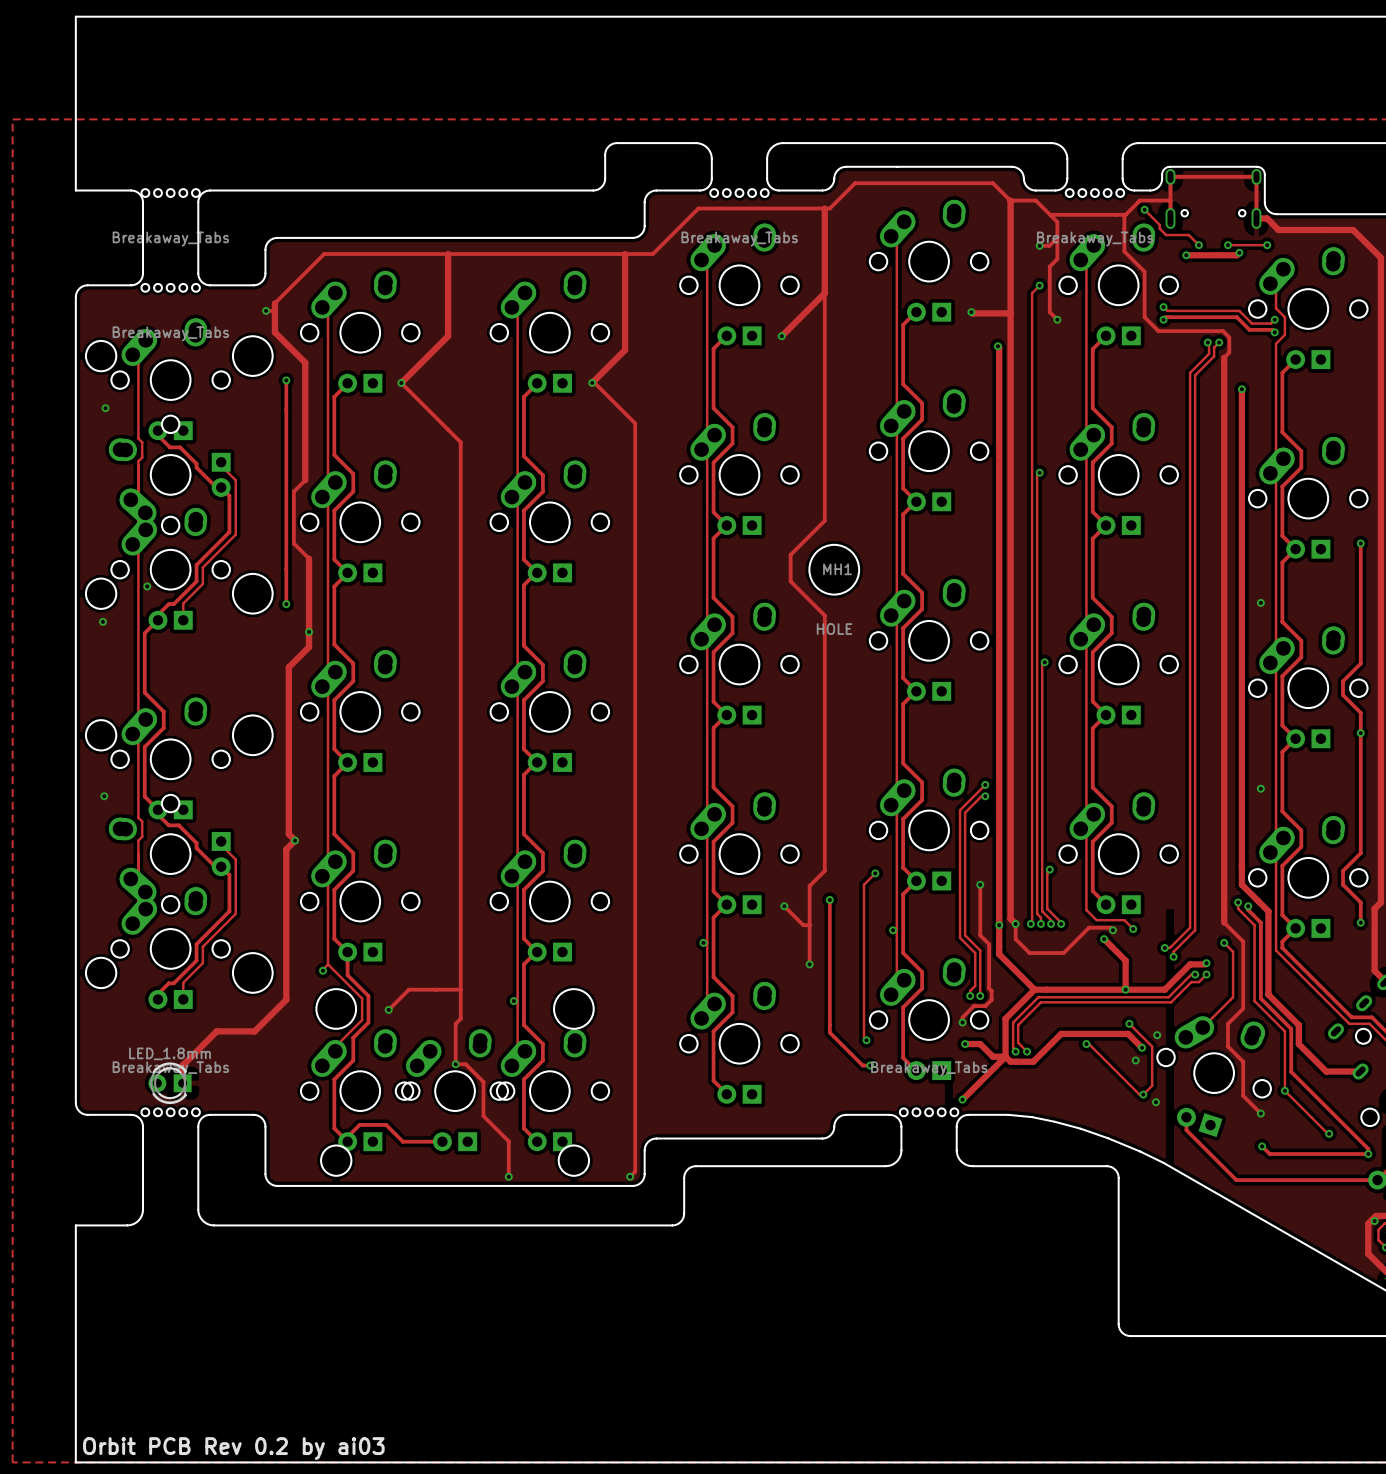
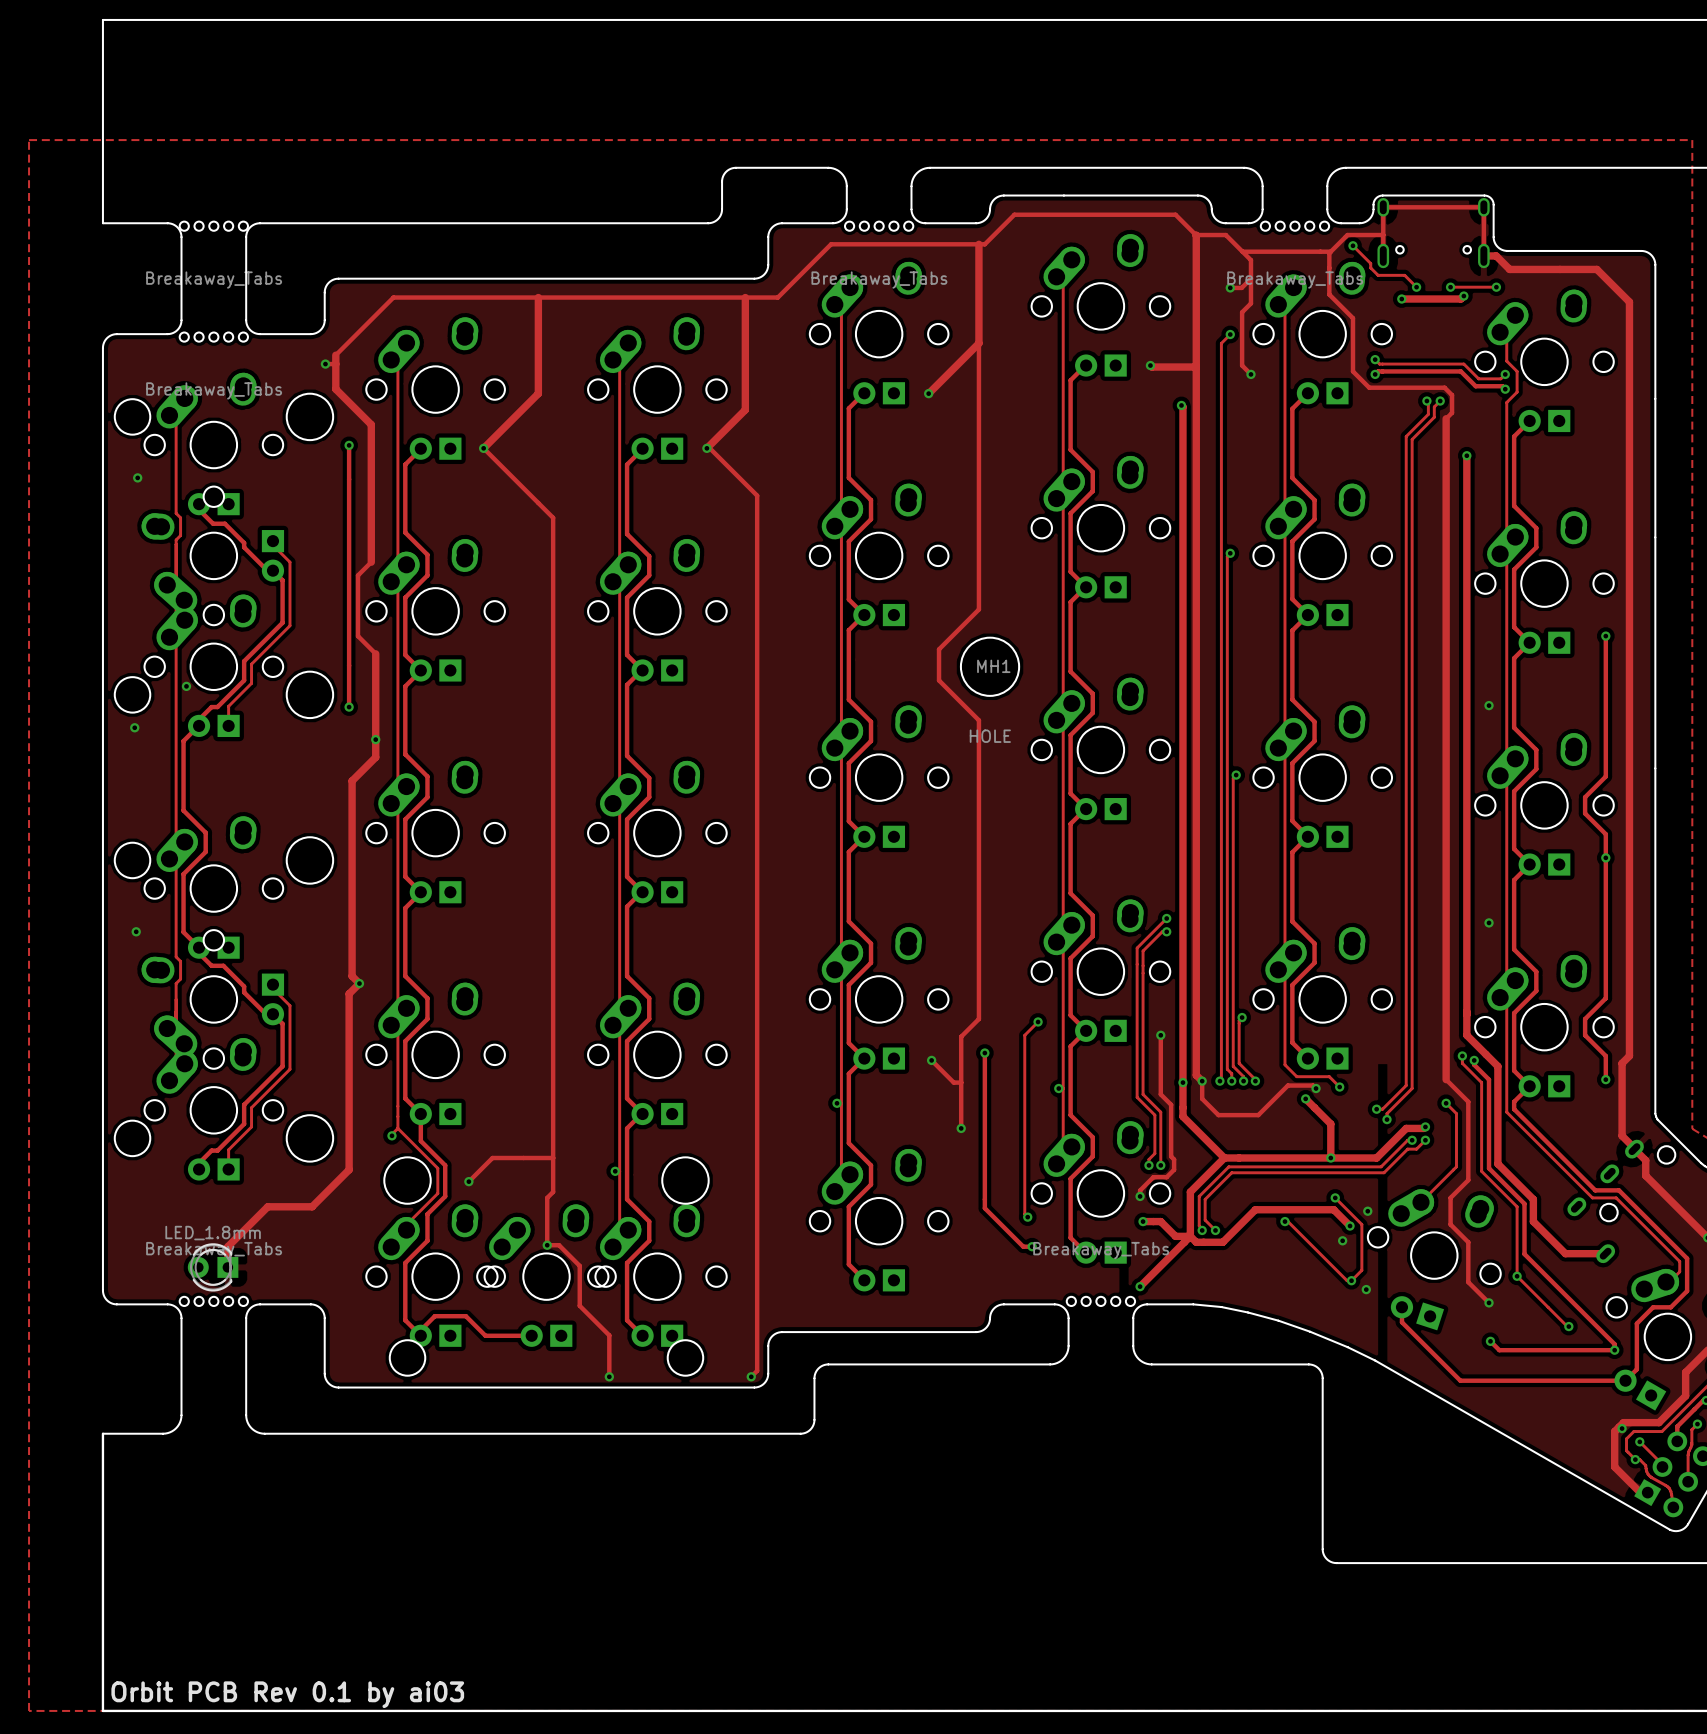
text: Orbit PCB Rev 0.2 by ai03 (233, 1448) -> Orbit PCB Rev 0.1 by ai03 (287, 1694)

